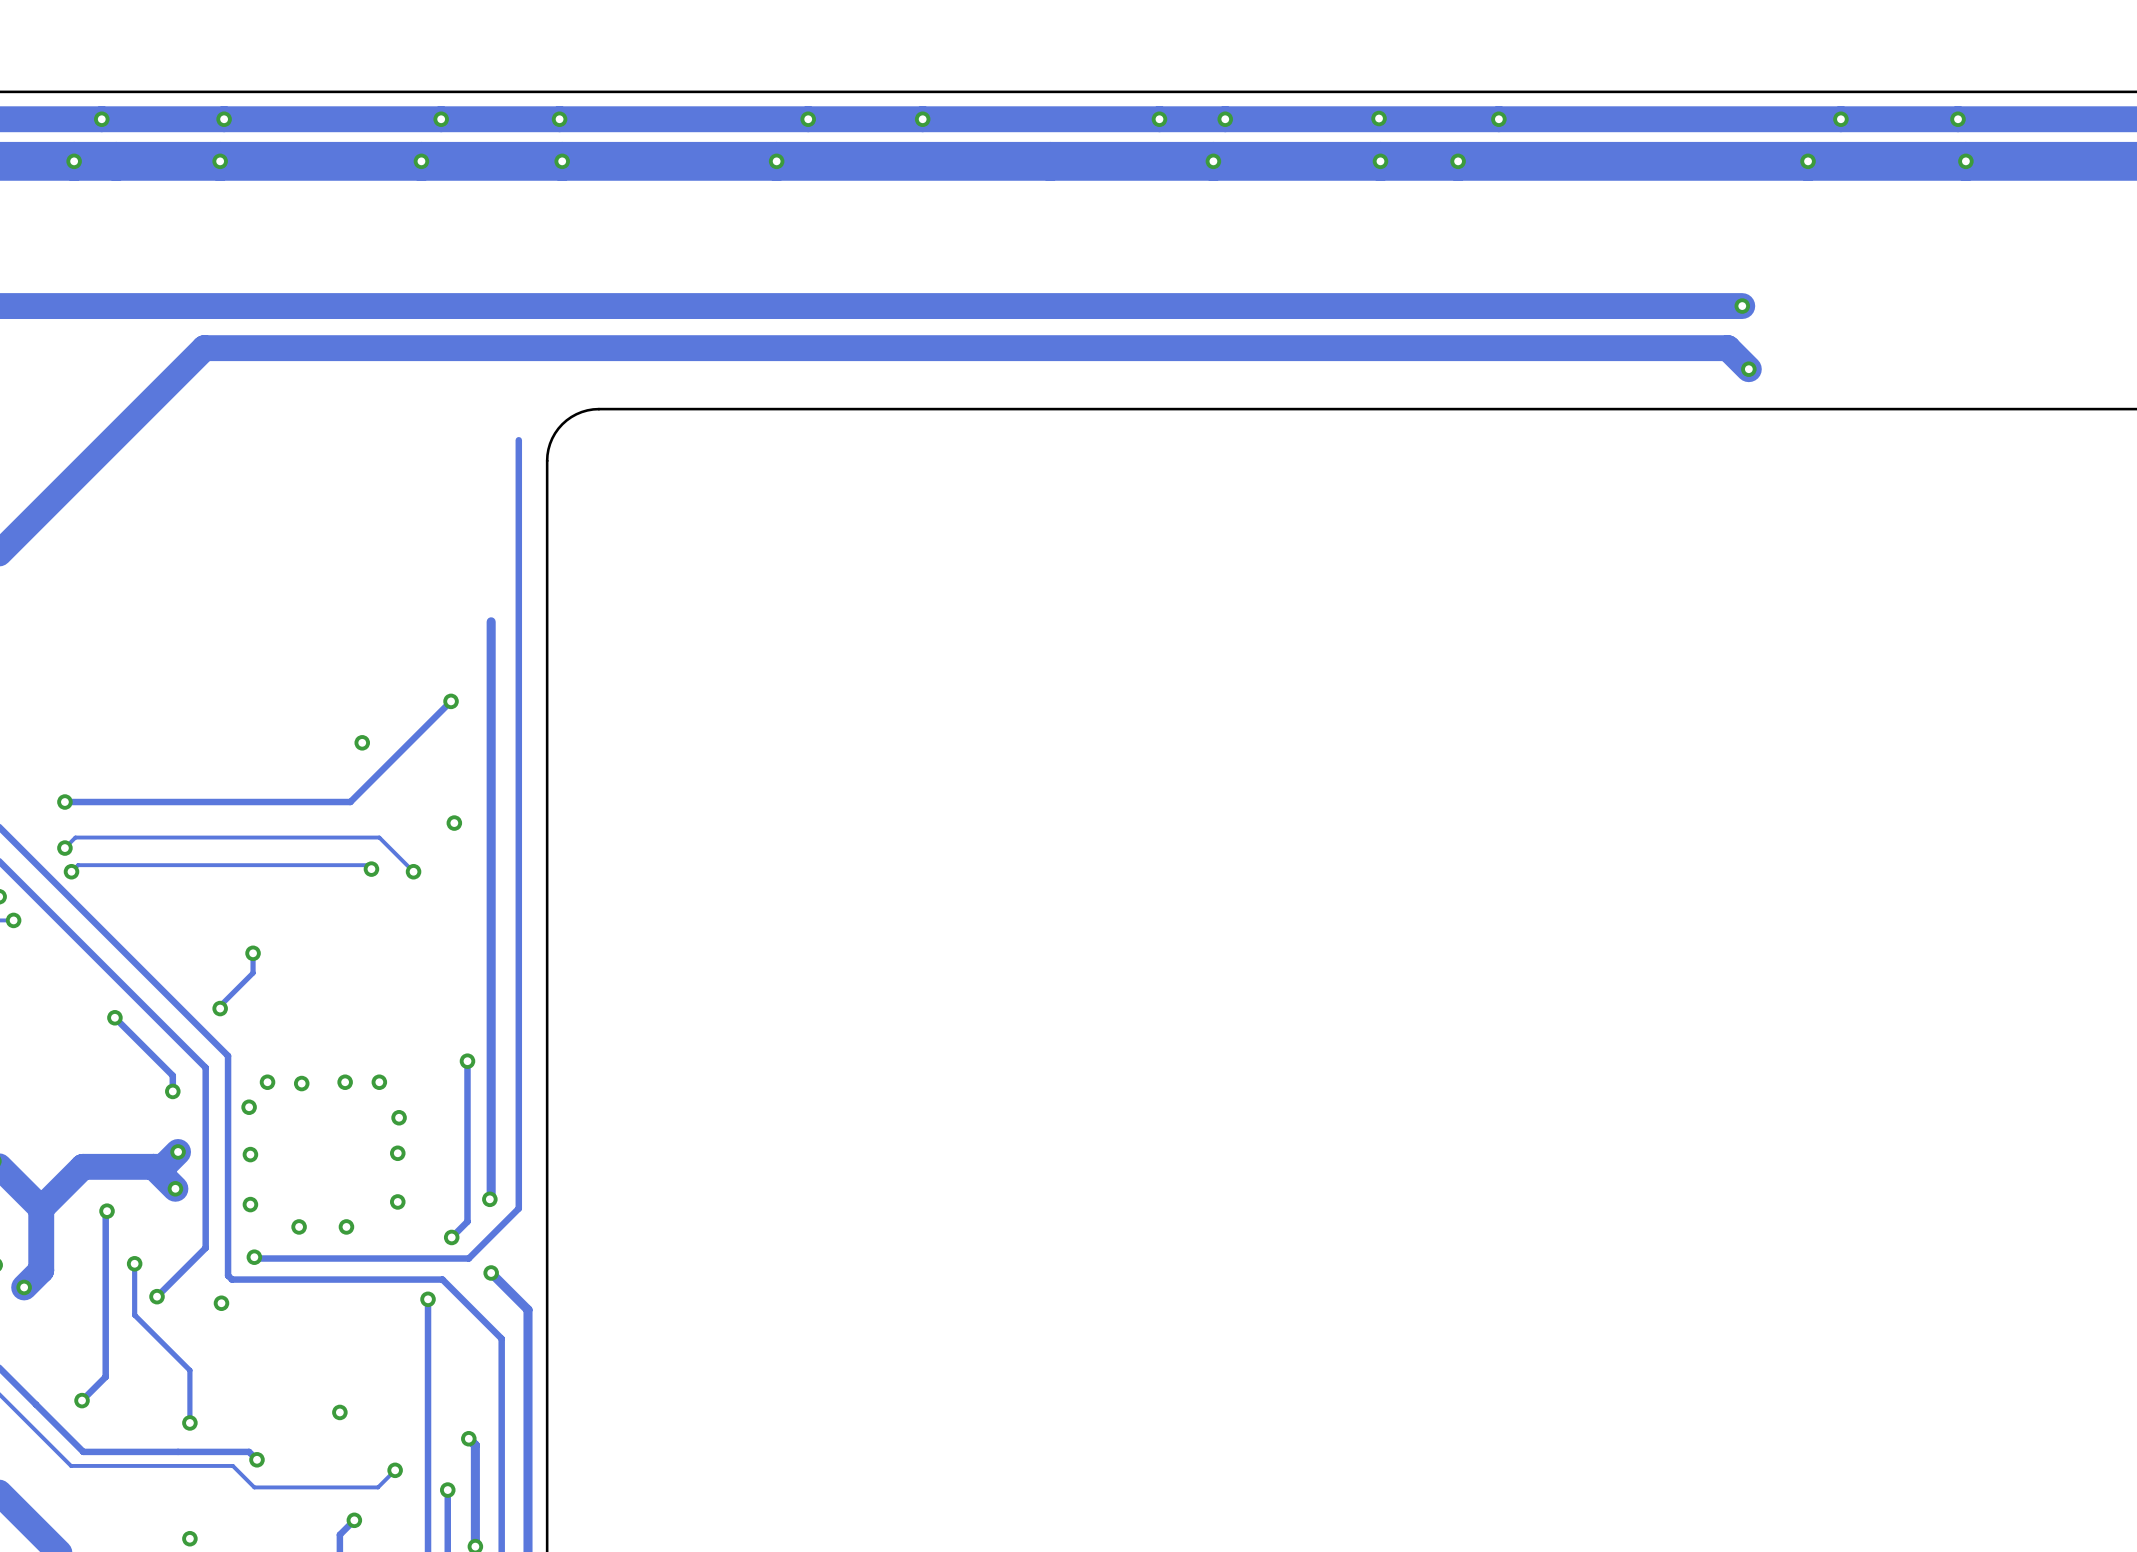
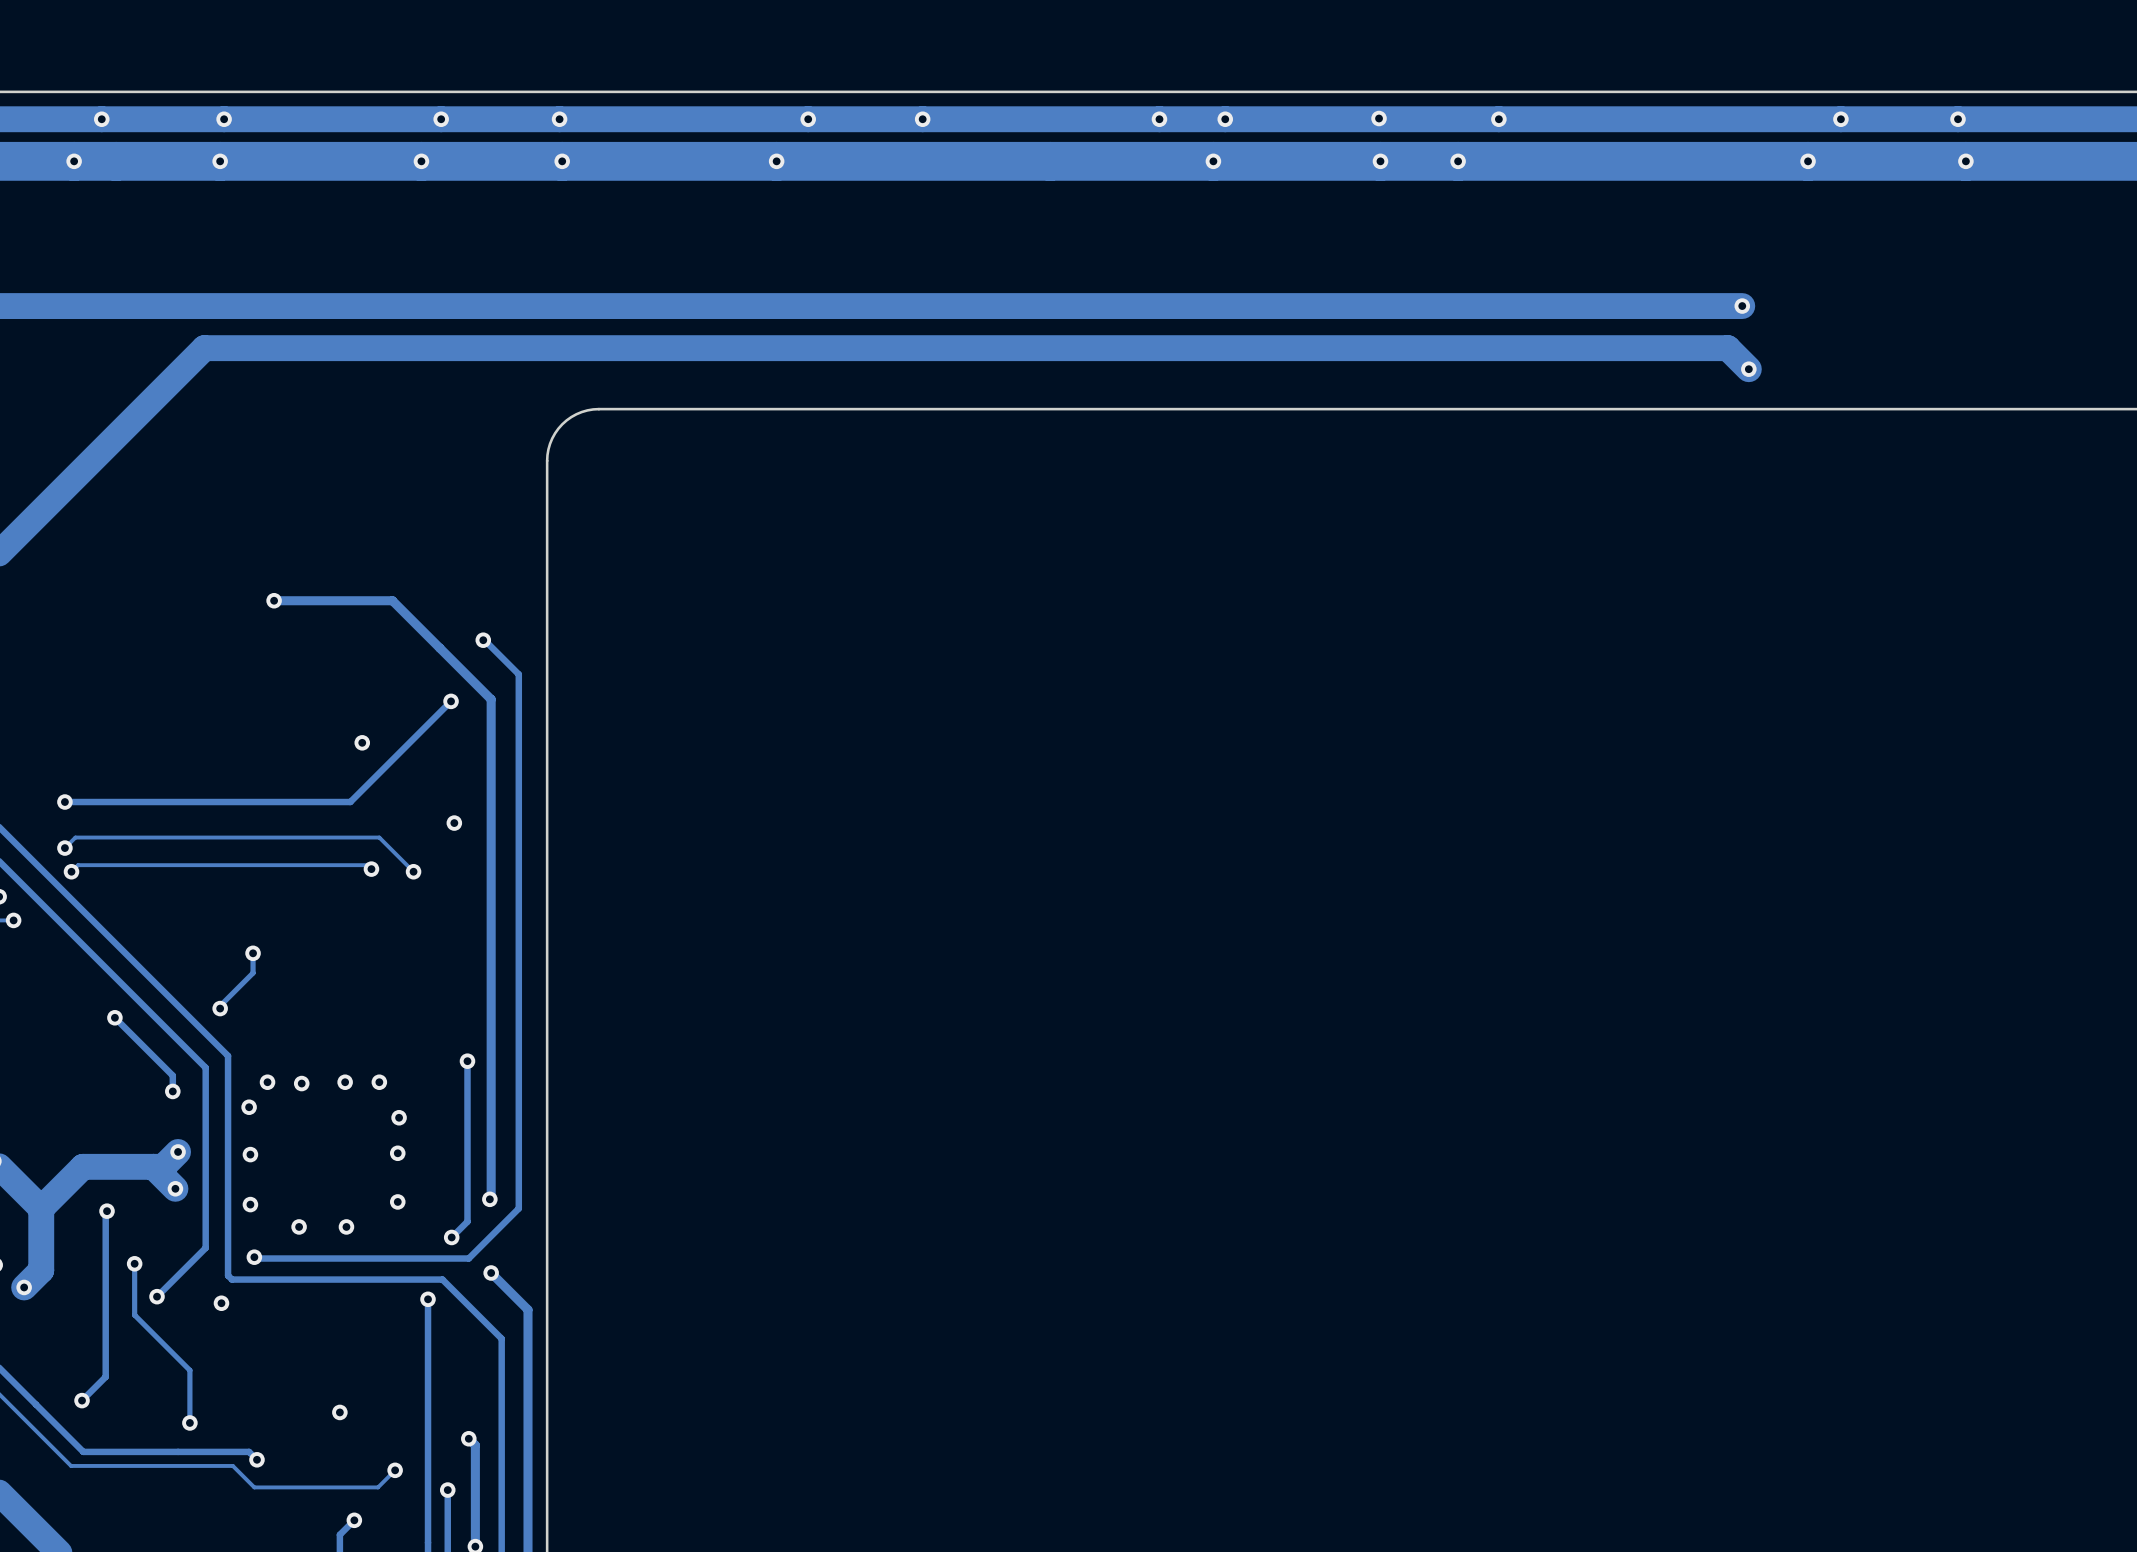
track: (518, 440) (518, 674) -> (483, 640) (518, 674)
via: none -> (274, 600)
track: (491, 621) (491, 699) -> (274, 600) (392, 600) (491, 699)
via: none -> (483, 640)
via: (189, 1538) -> none

